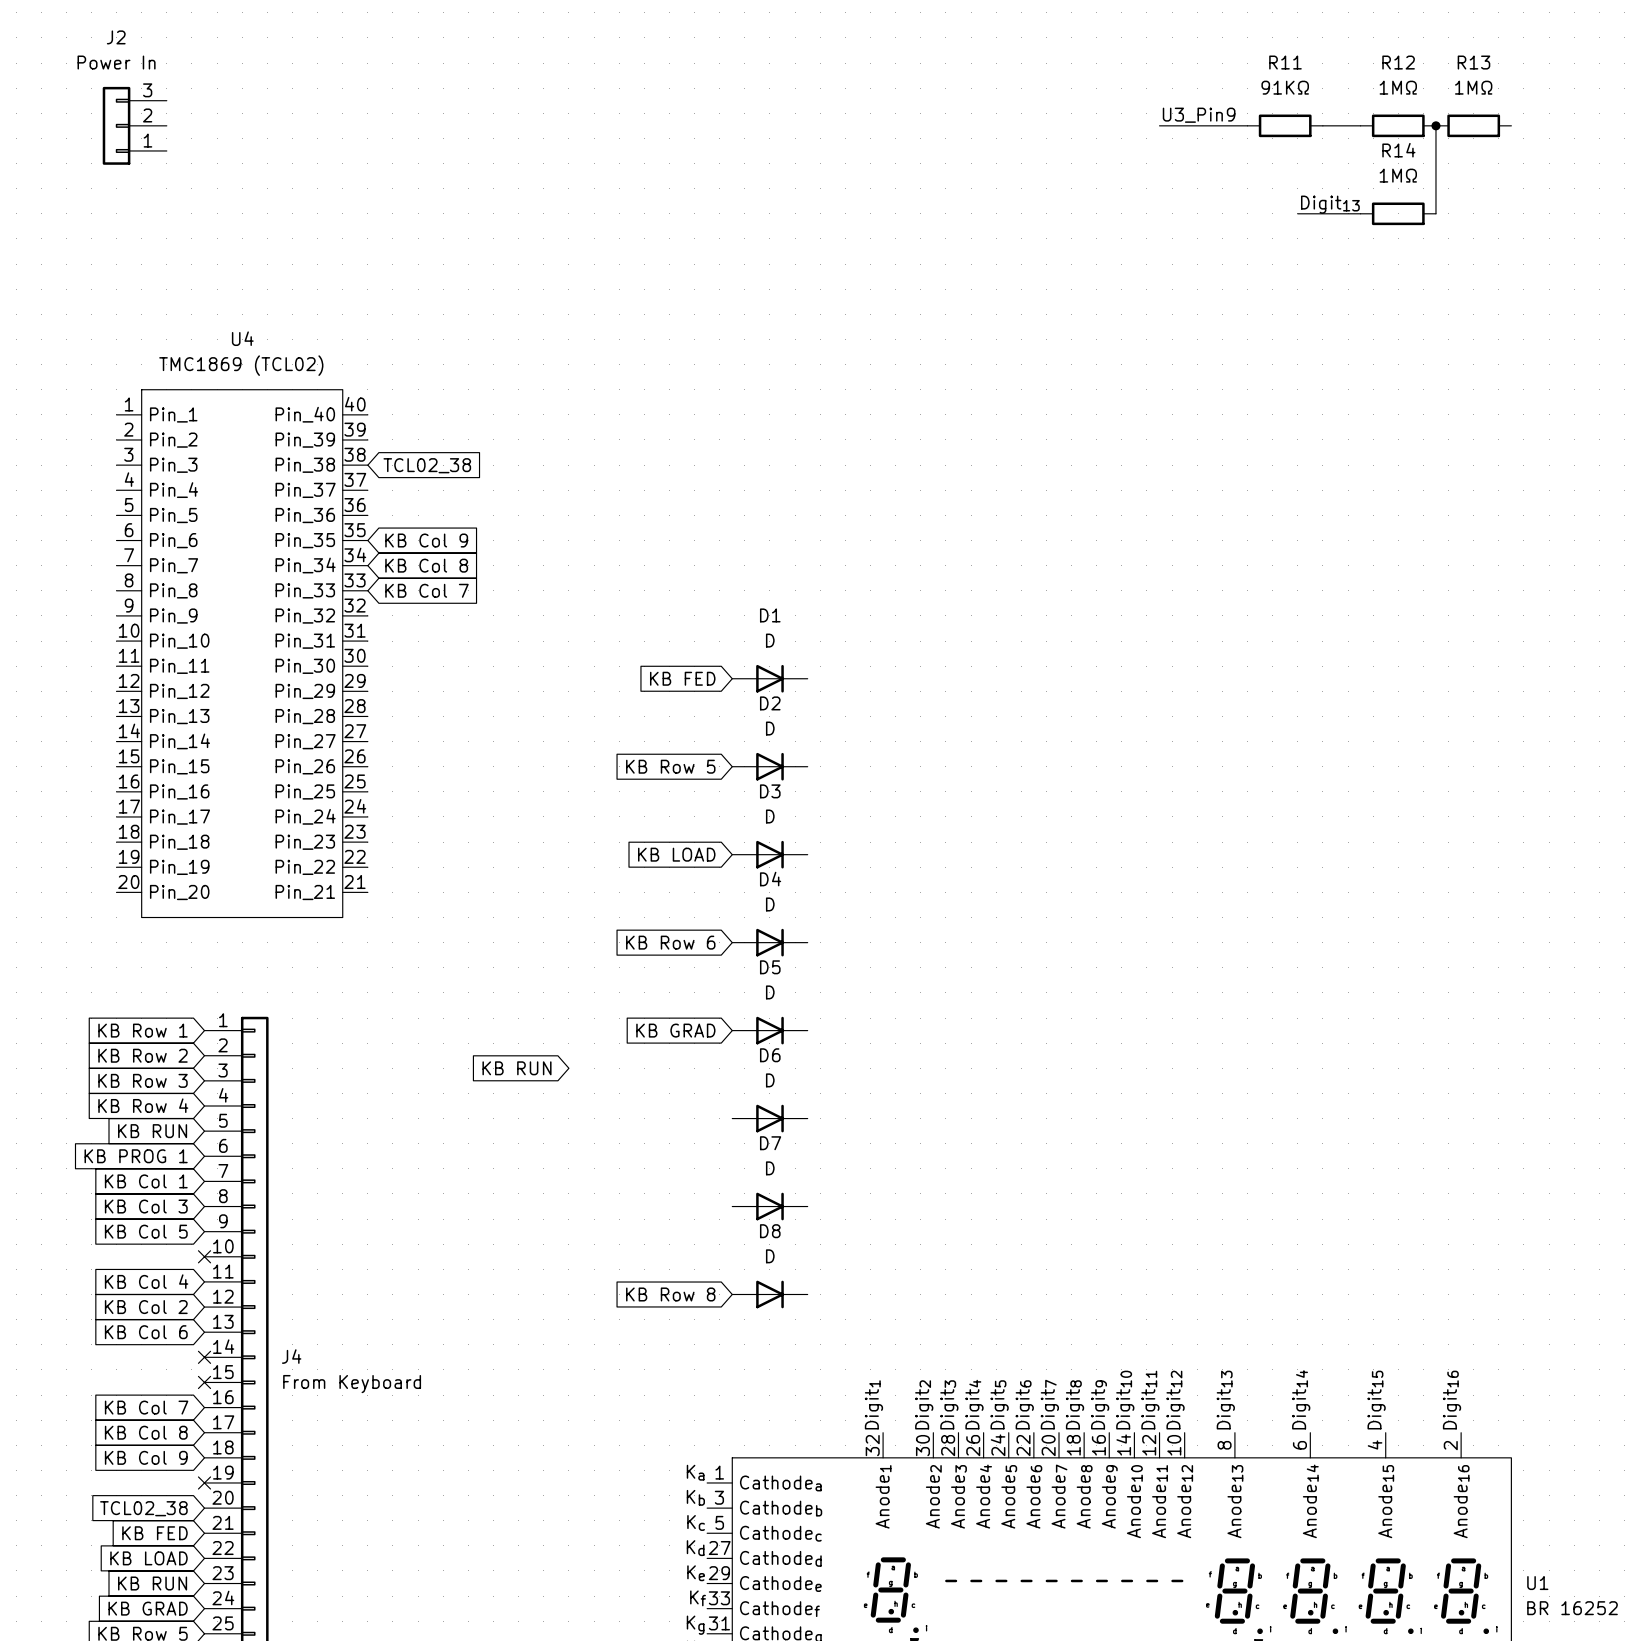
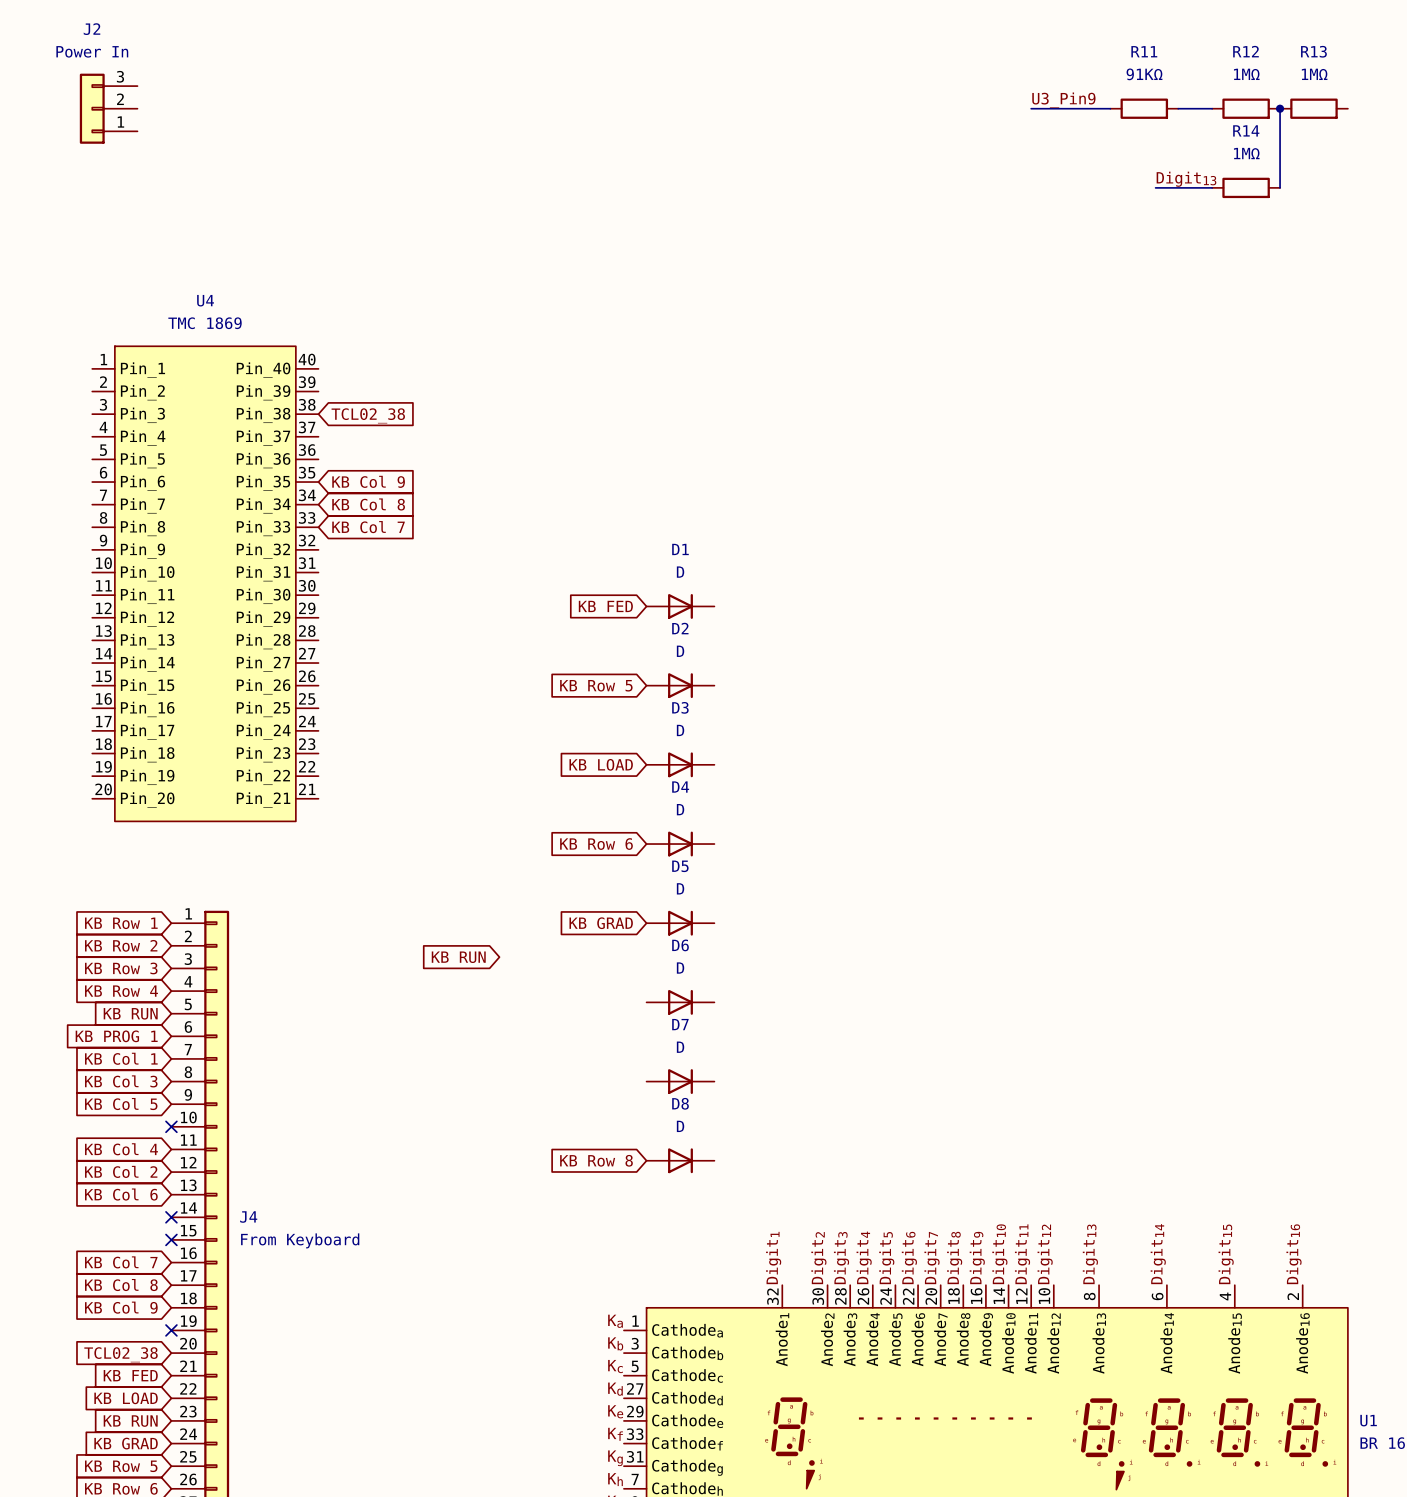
U4 value: TMC1869 (TCL02) (241, 365) -> TMC 1869 (205, 323)

